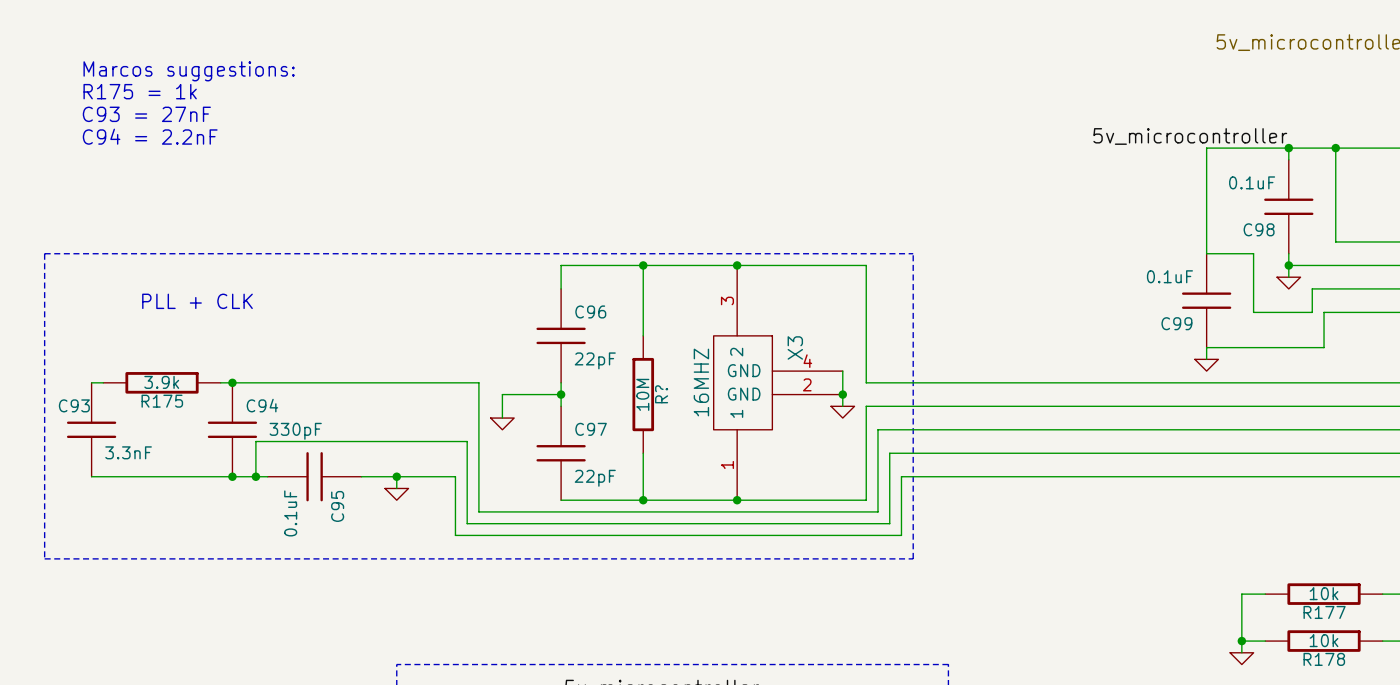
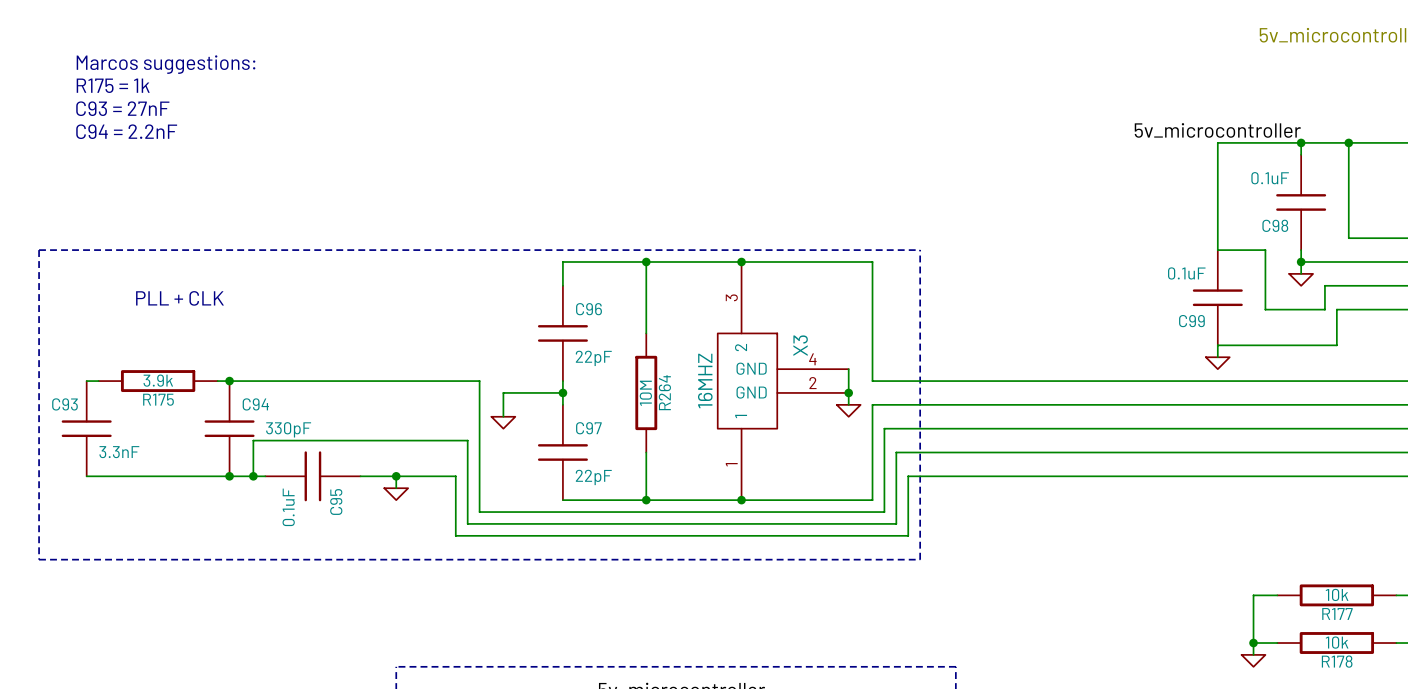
R? name: R? (661, 394) -> R264 (664, 392)

